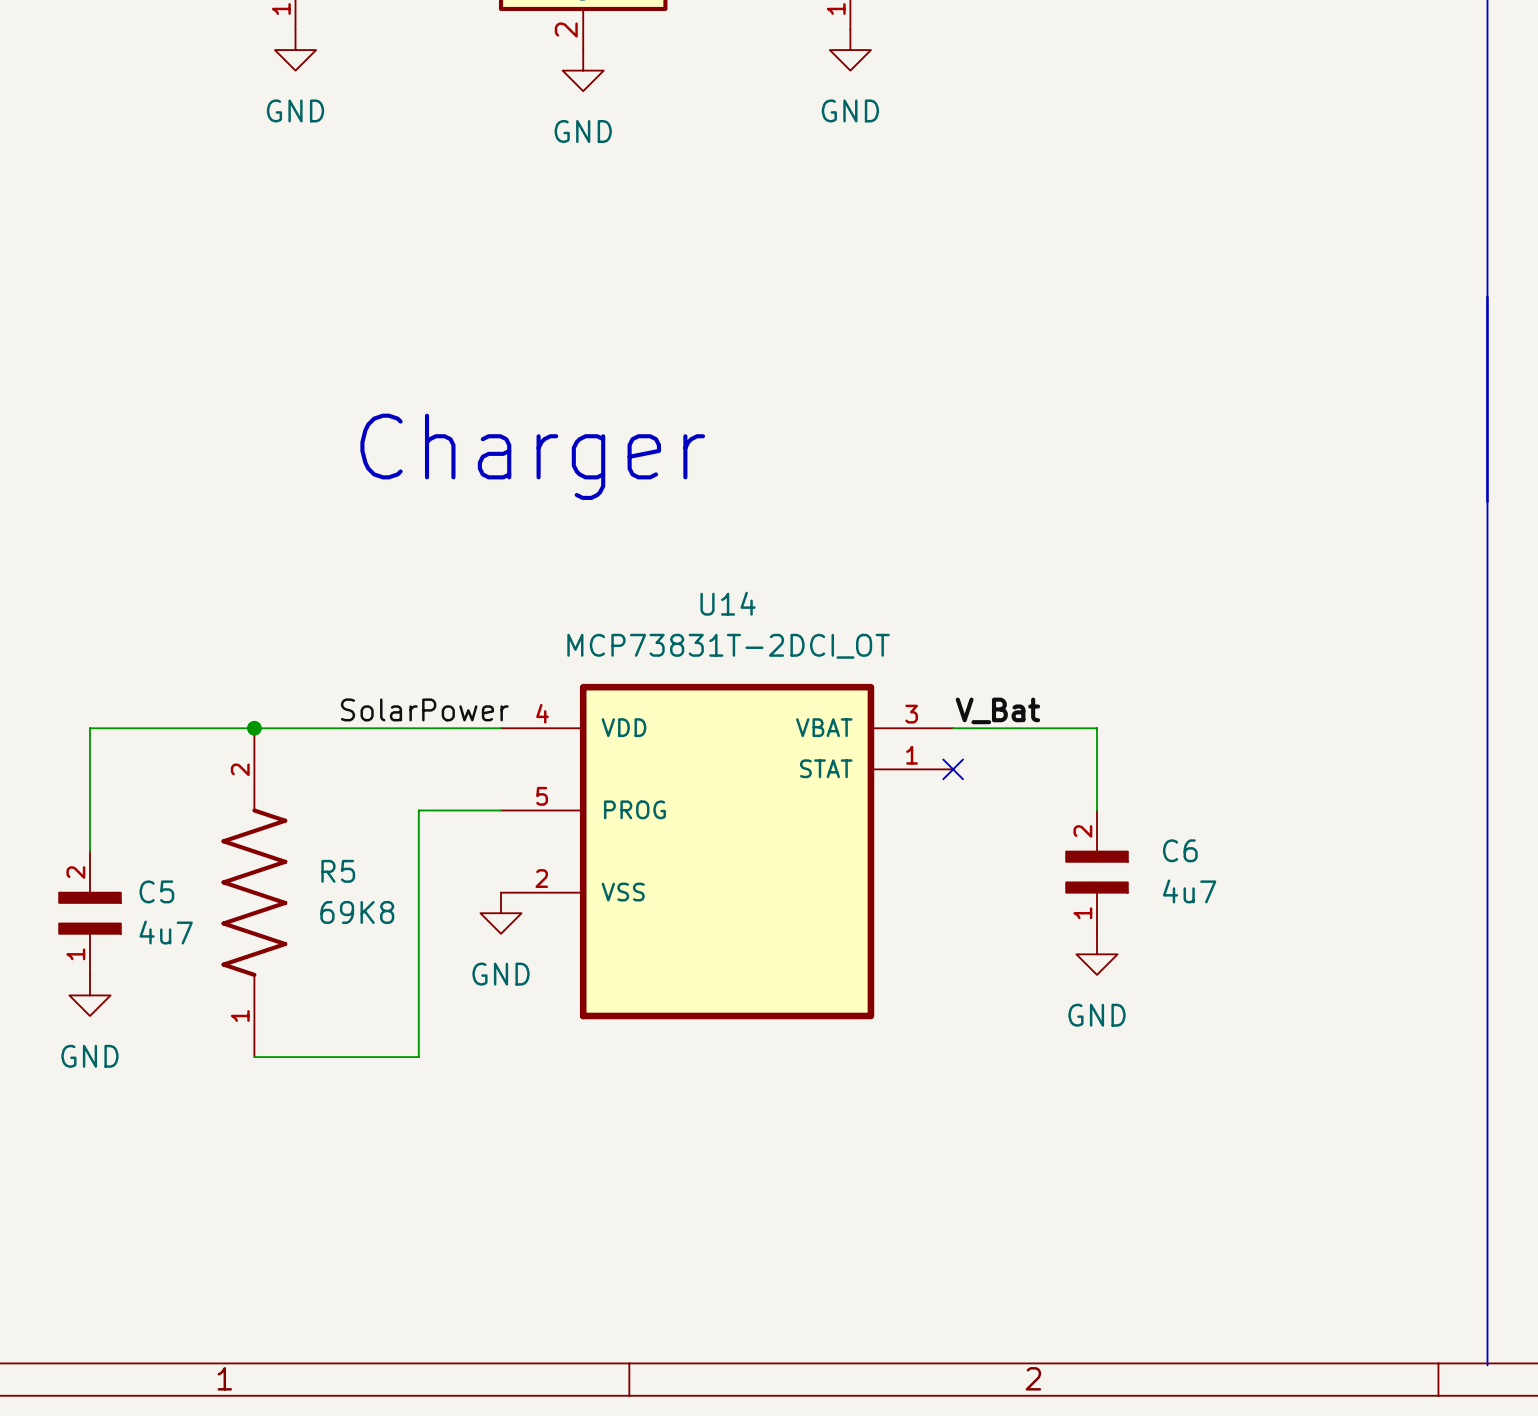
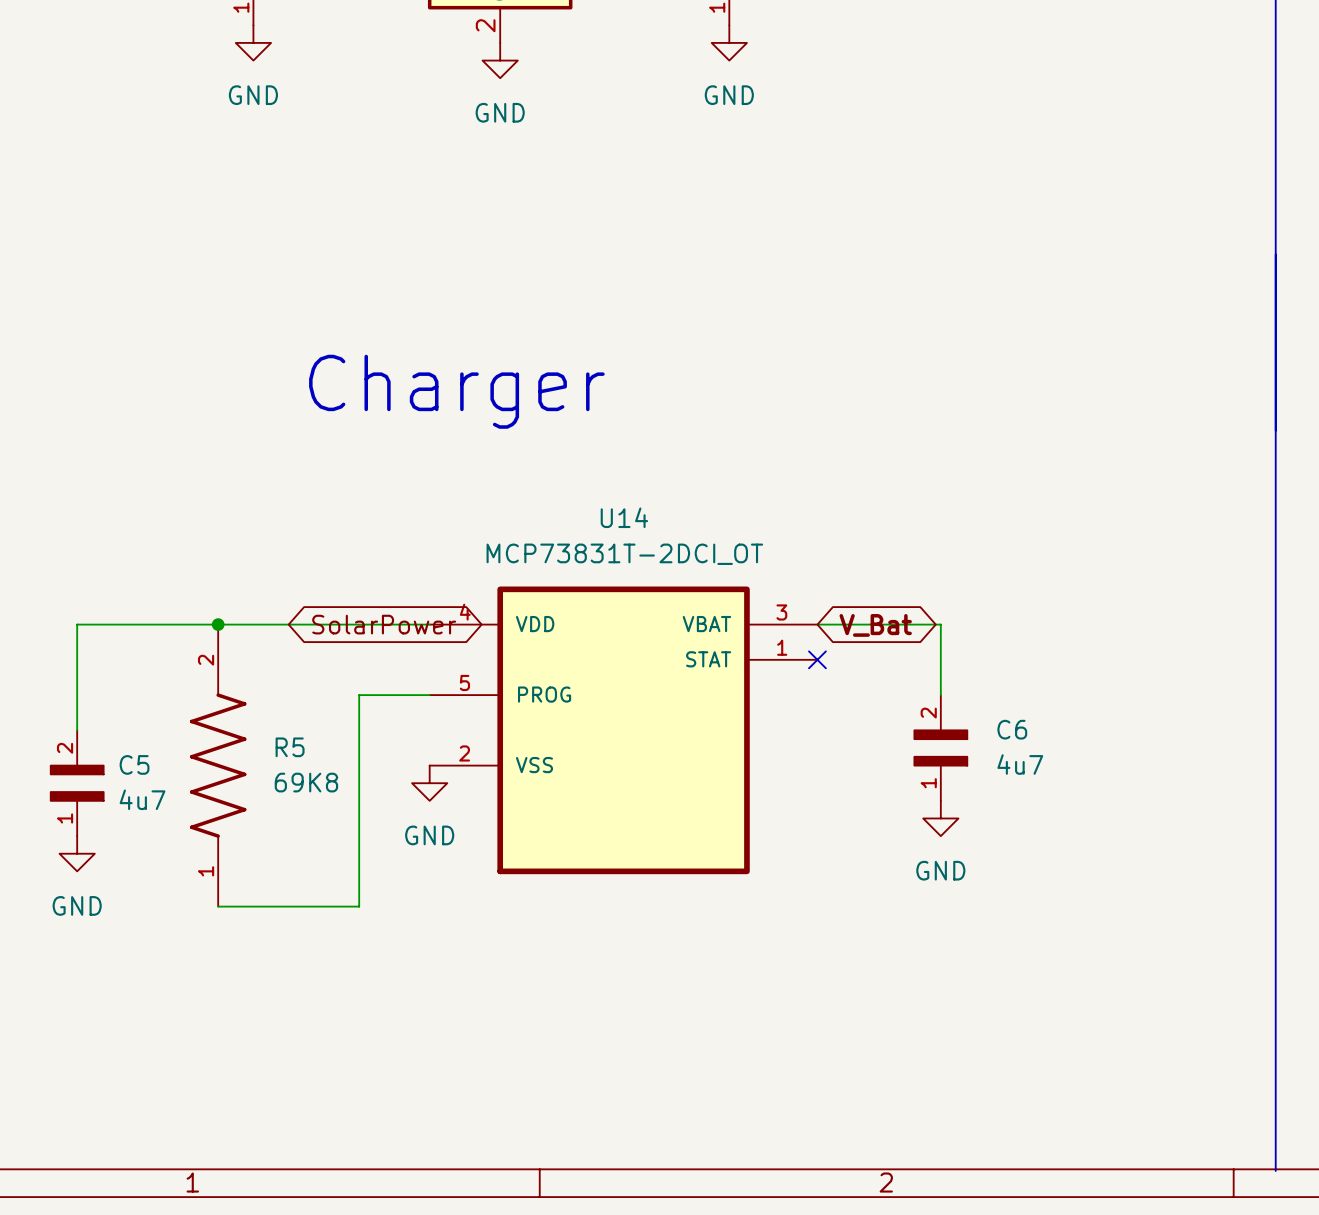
label: SolarPower (424, 709) -> none
label: V_Bat (997, 710) -> none
global label: none -> SolarPower (384, 624)
global label: none -> V_Bat (875, 625)

